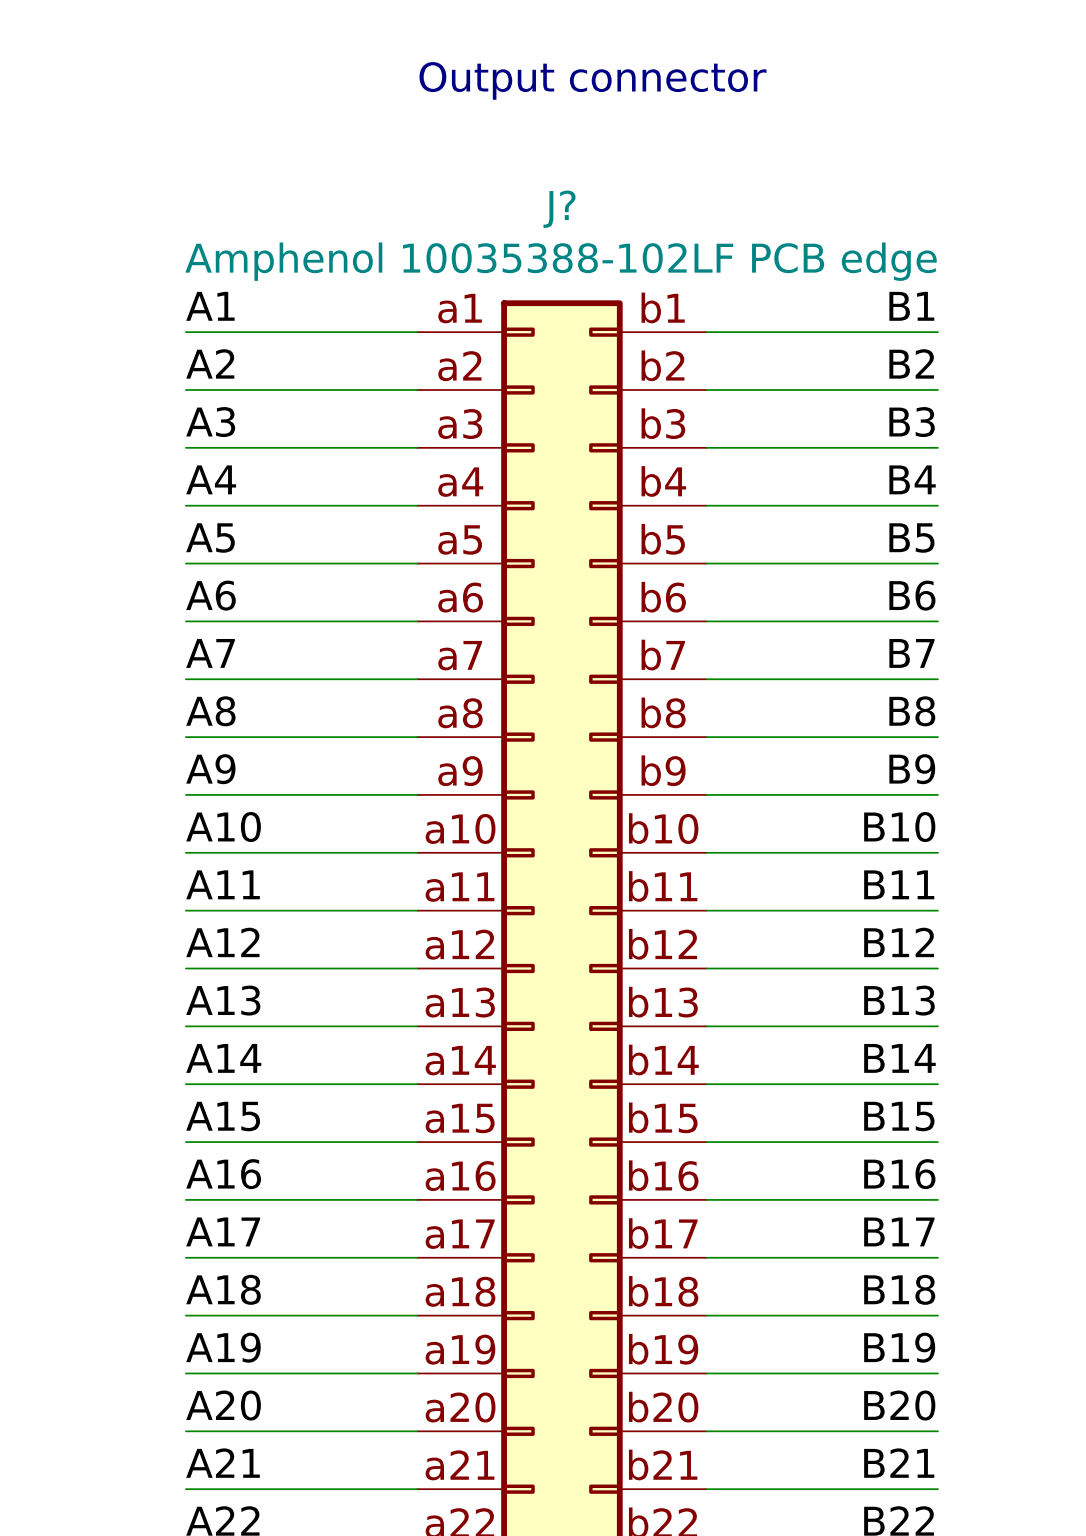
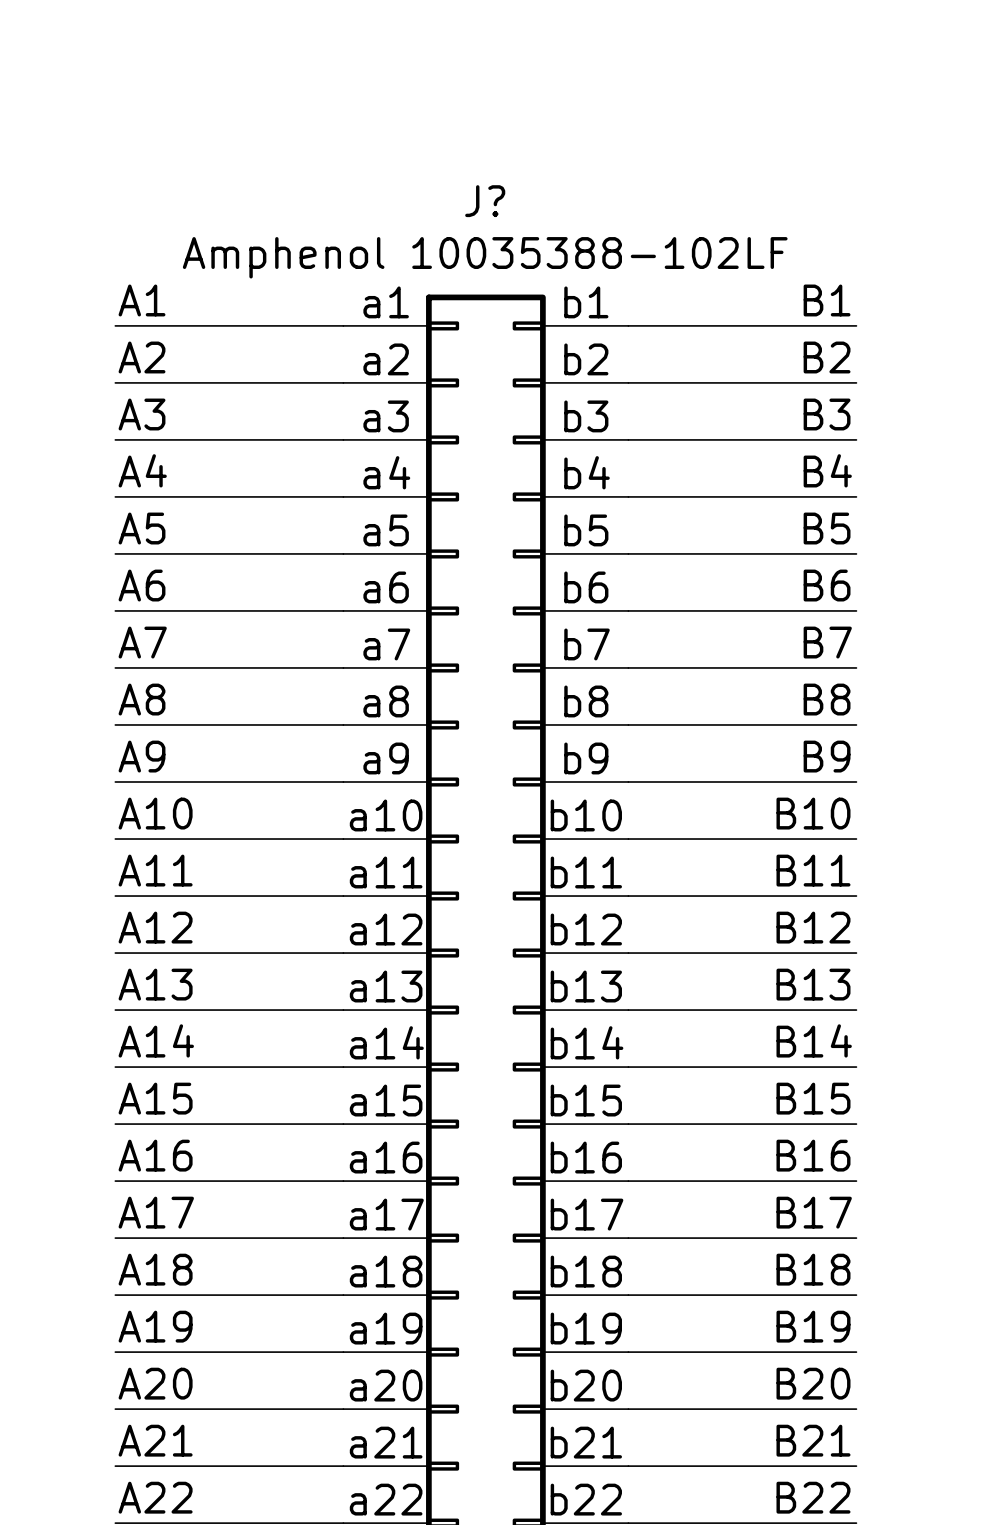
text: Output connector (593, 80) -> none
J? value: Amphenol 10035388-102LF PCB edge (561, 261) -> Amphenol 10035388-102LF (485, 257)

